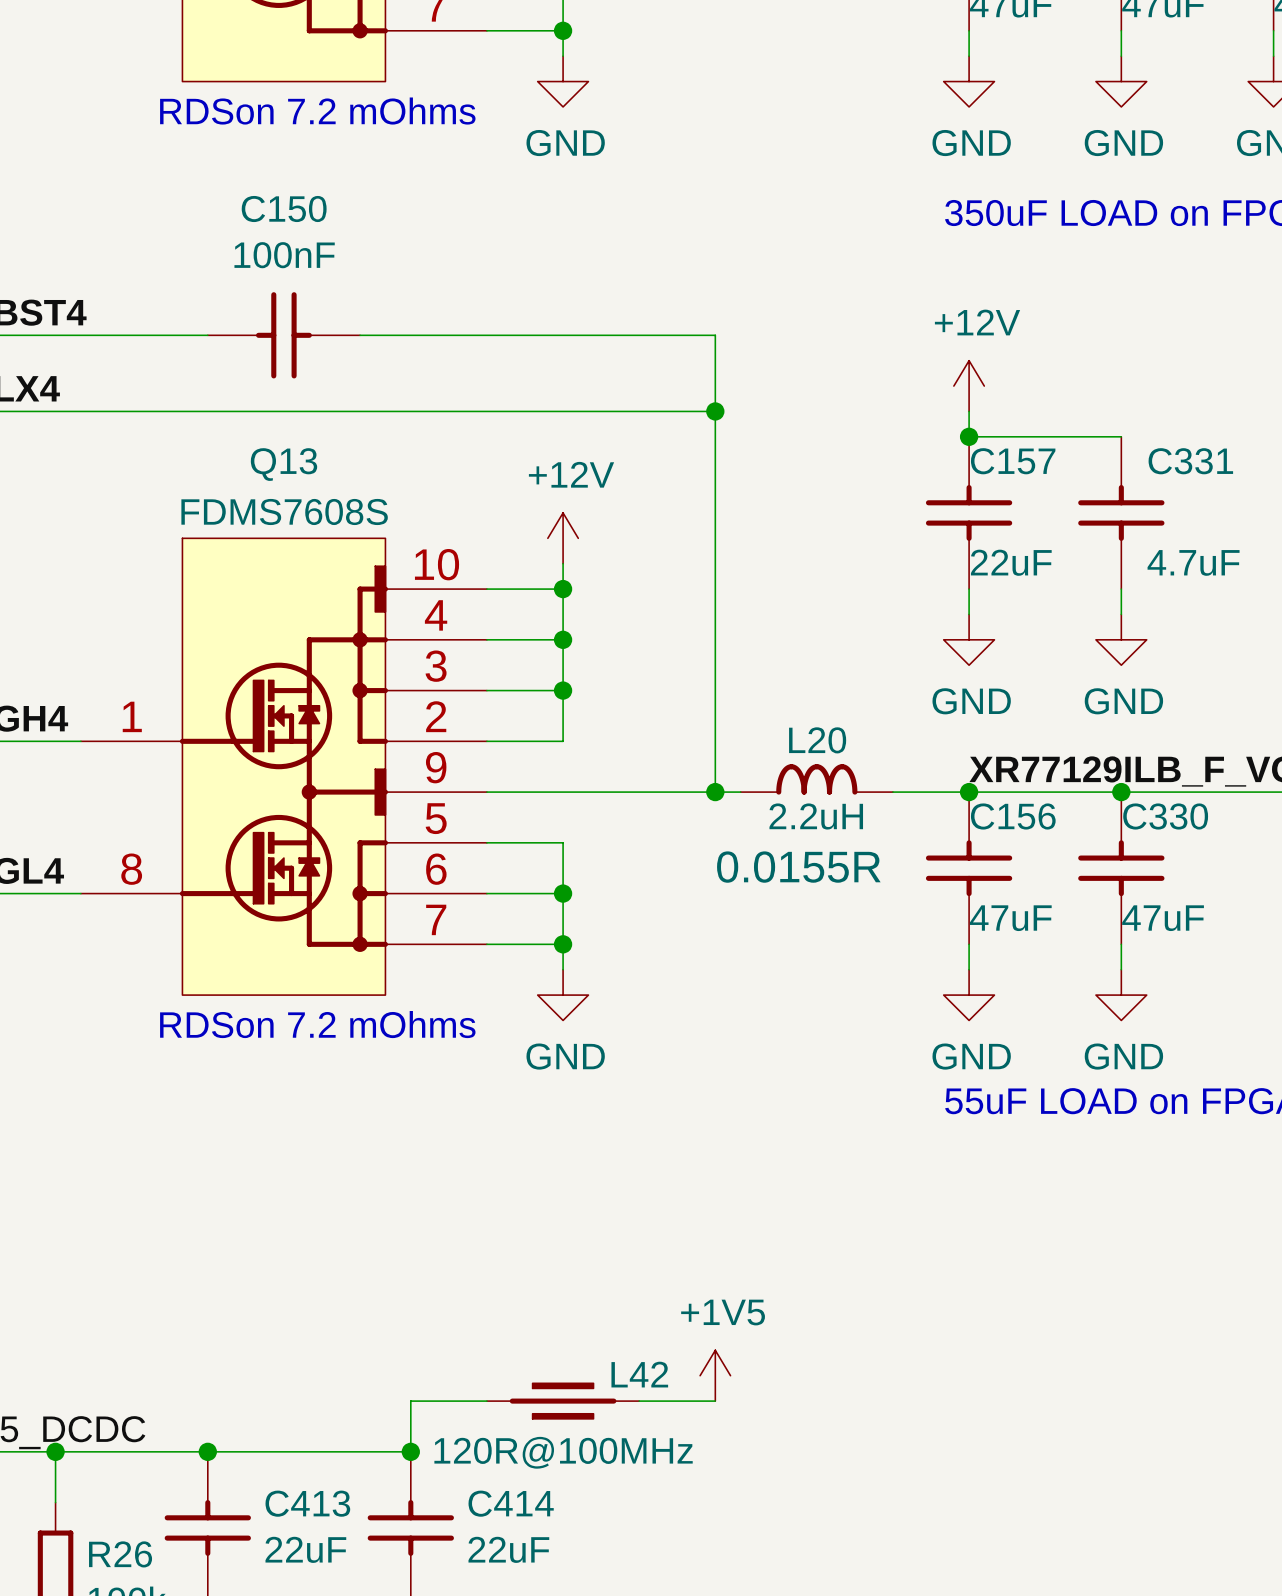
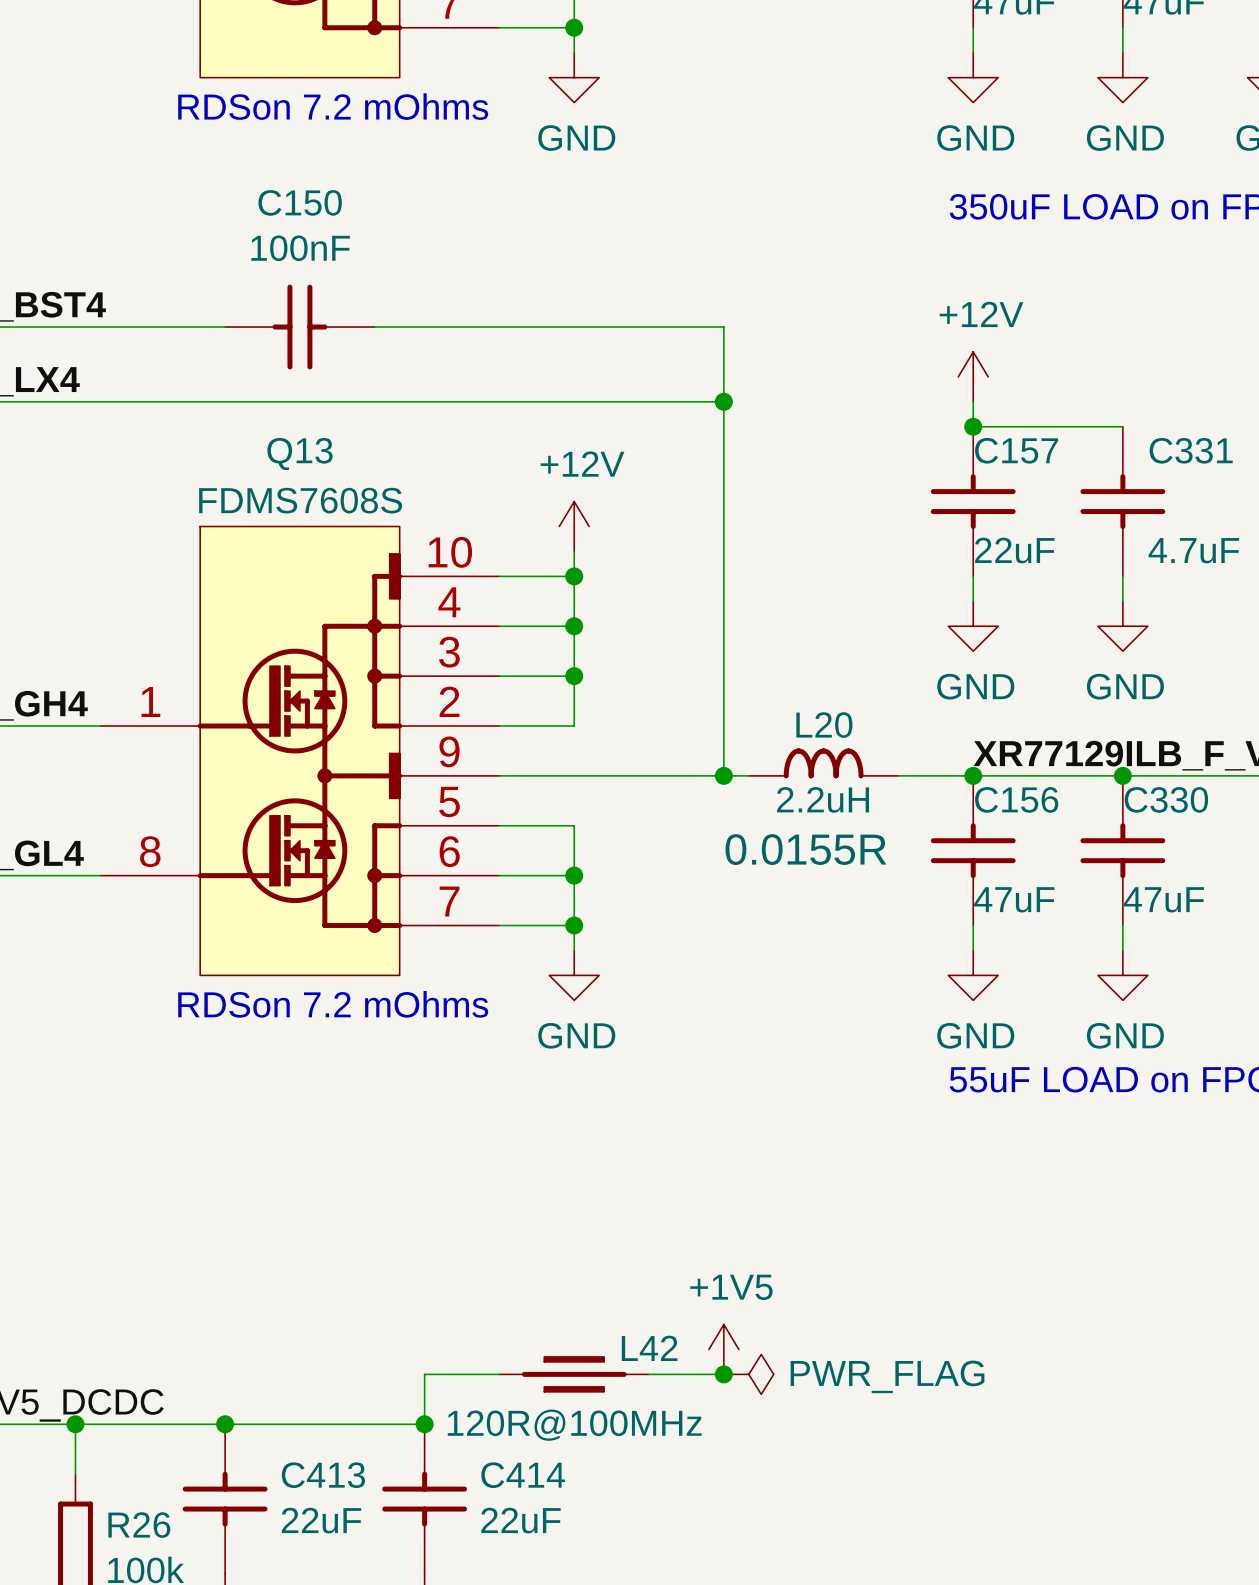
junction: none -> (723, 1374)
power symbol: none -> PWR_FLAG (748, 1374)

